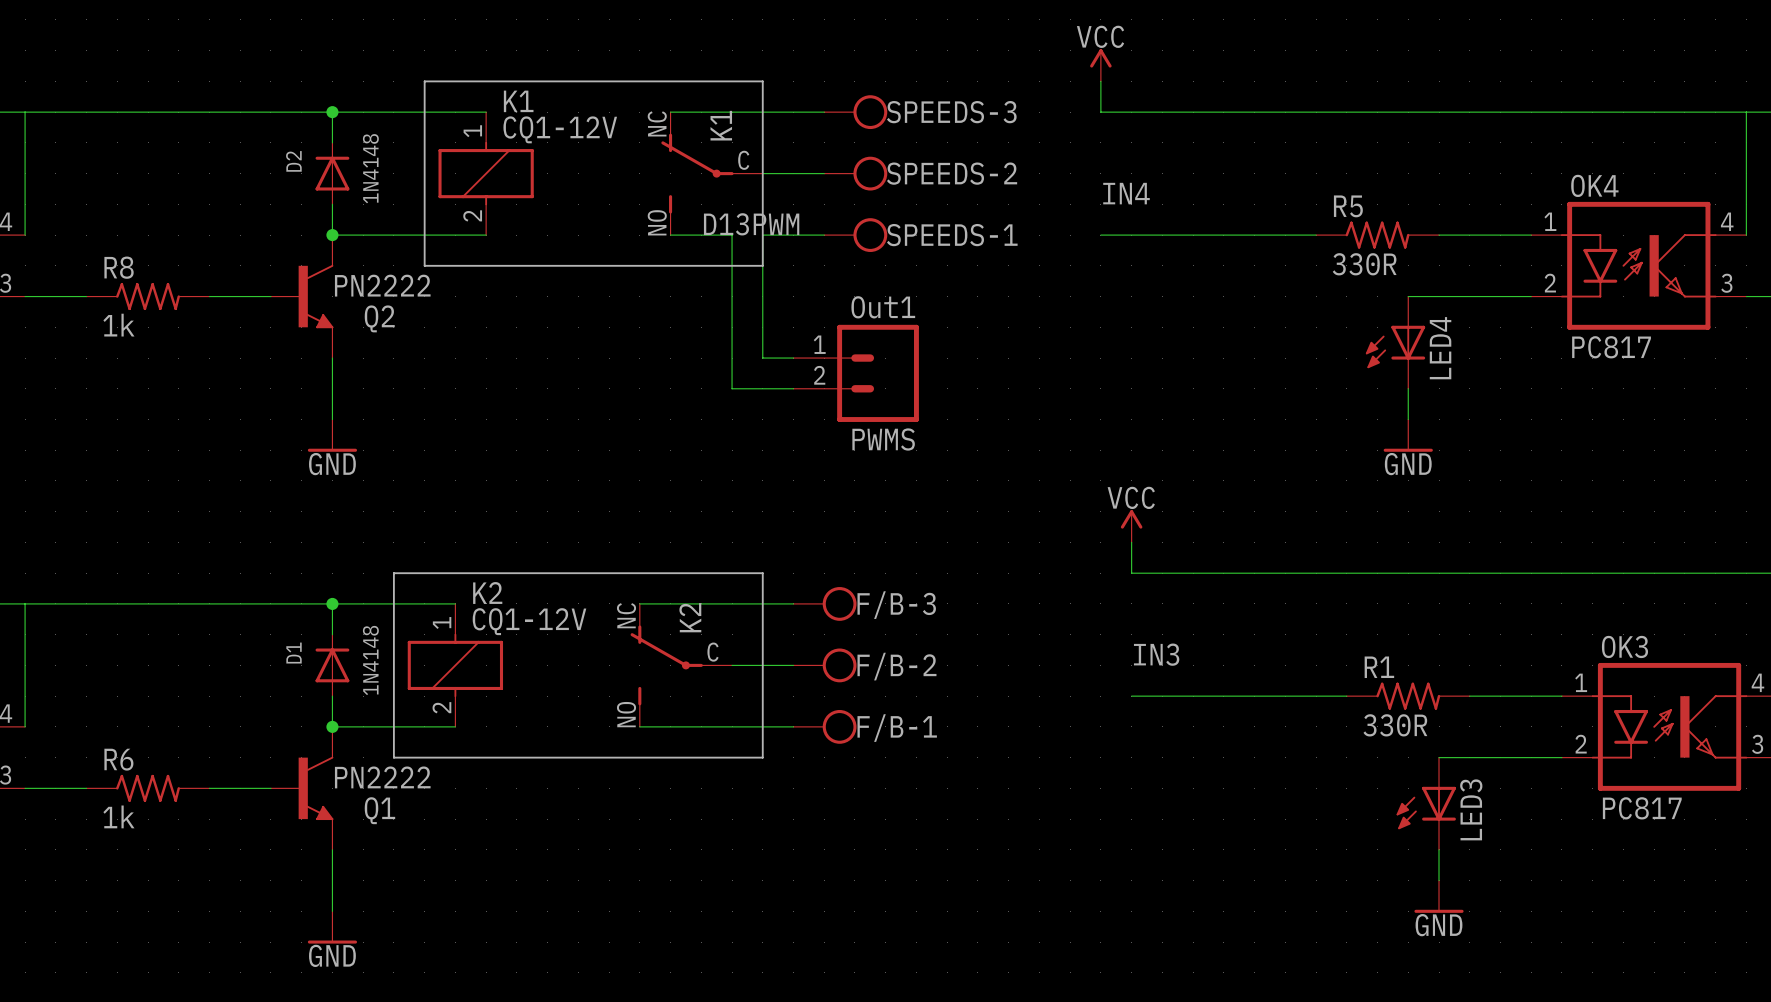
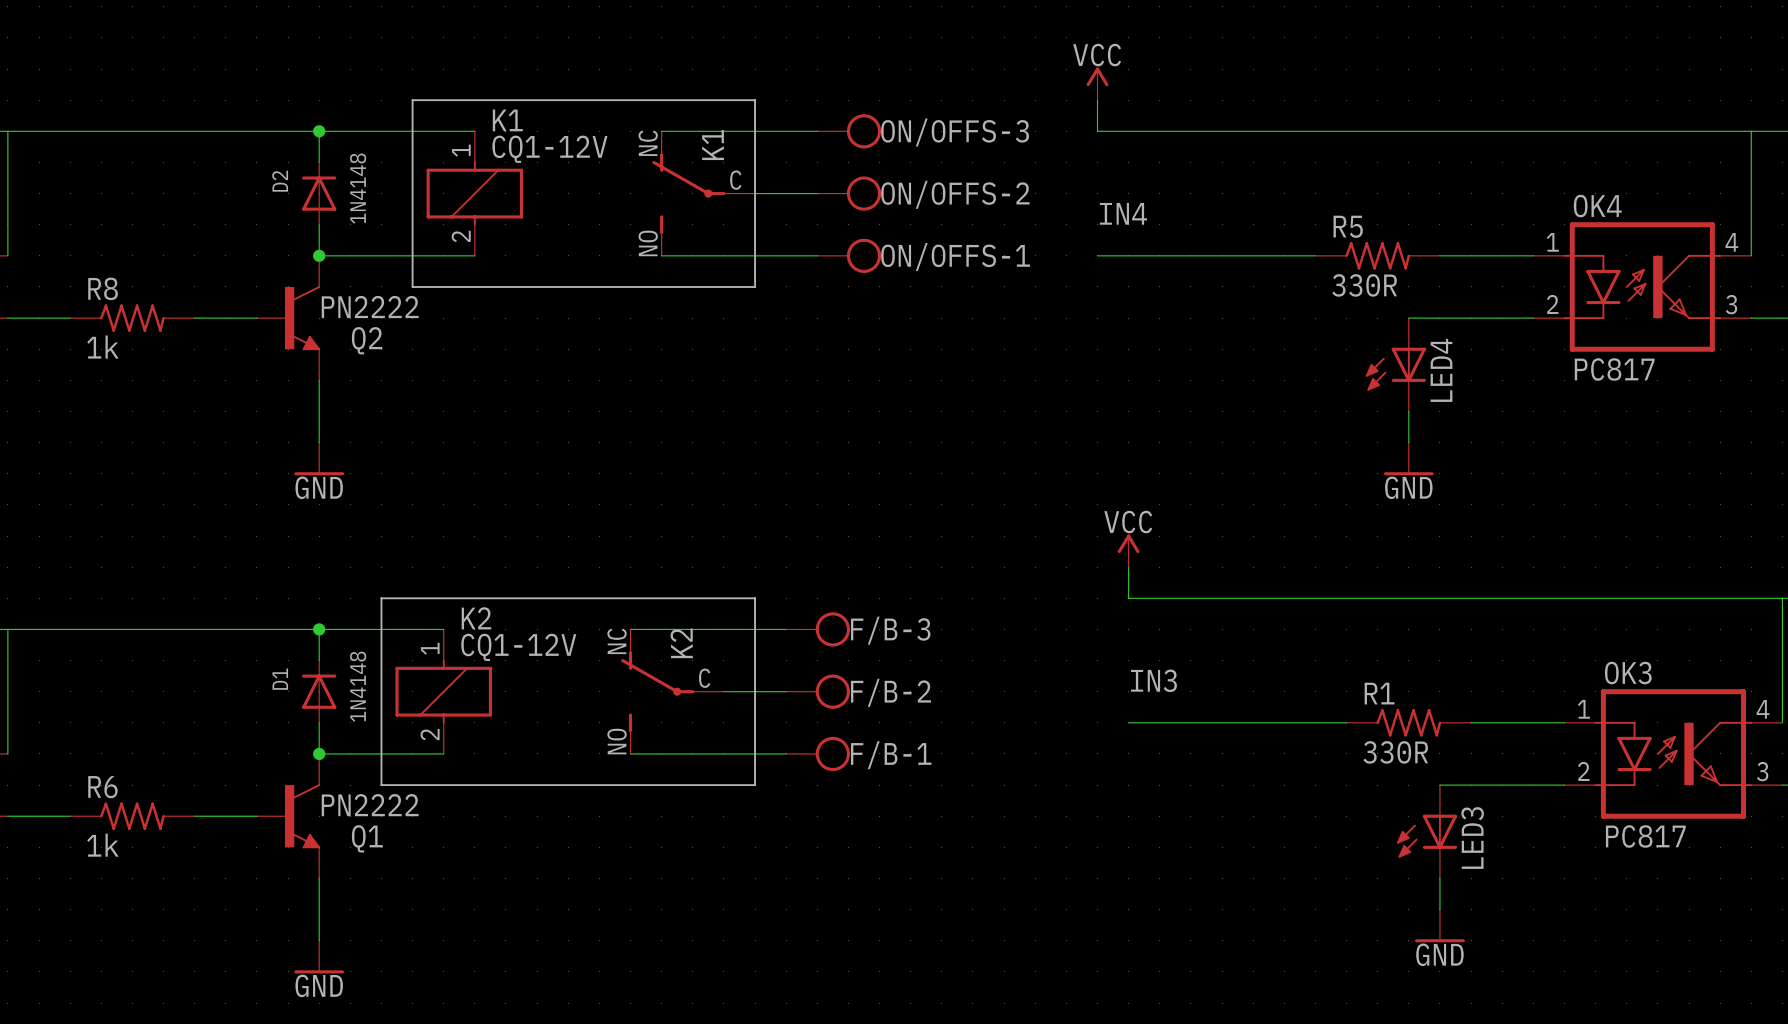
SPEEDS-3 name: SPEEDS-3 (951, 112) -> ON/OFFS-3 (955, 132)
SPEEDS-2 name: SPEEDS-2 (952, 173) -> ON/OFFS-2 (955, 194)
label: D13PWM (751, 224) -> none
wire: (732, 235) (732, 388) (793, 388) -> none
wire: (762, 235) (762, 358) (793, 358) -> (755, 255) (723, 255)
SPEEDS-1 name: SPEEDS-1 (952, 235) -> ON/OFFS-1 (955, 257)
PWMS: Out1 (856, 373) -> none

